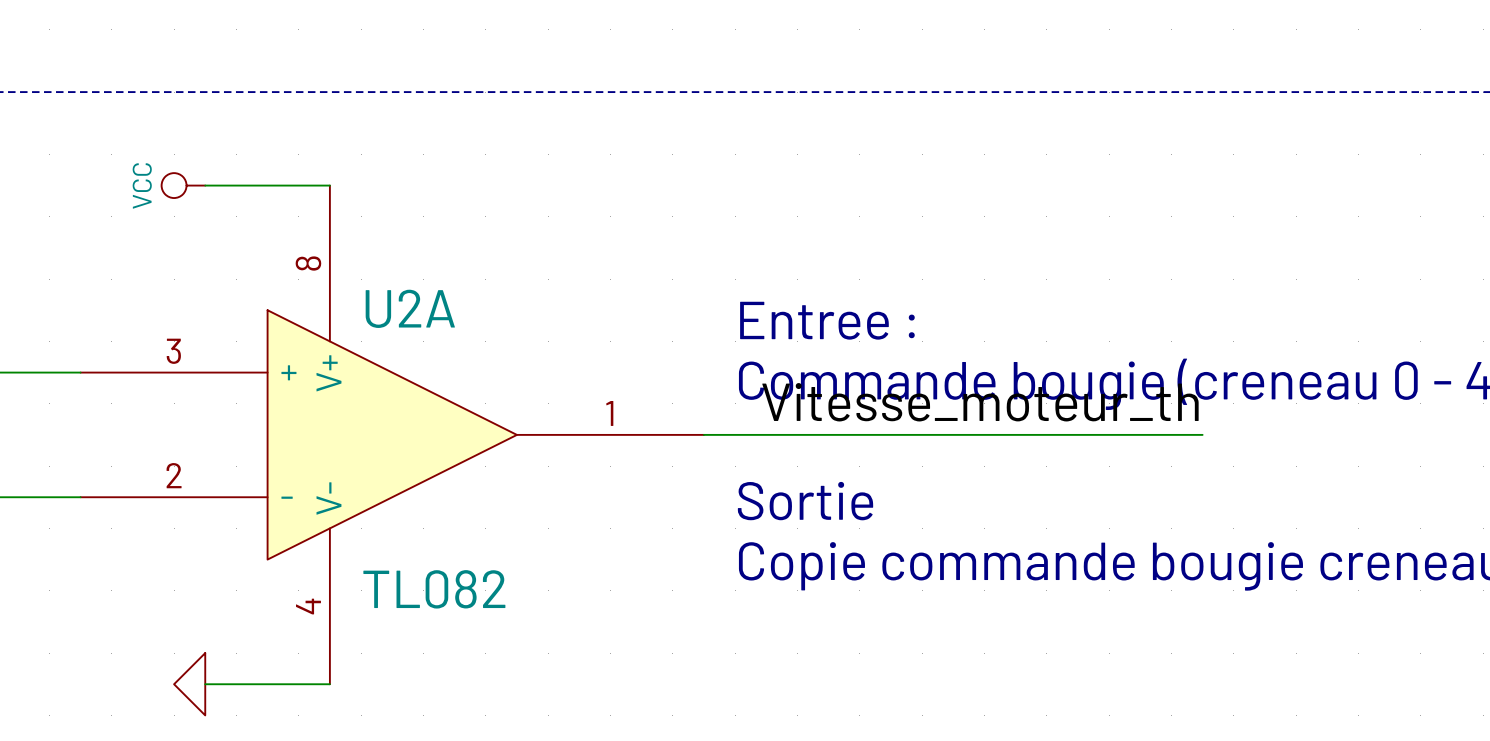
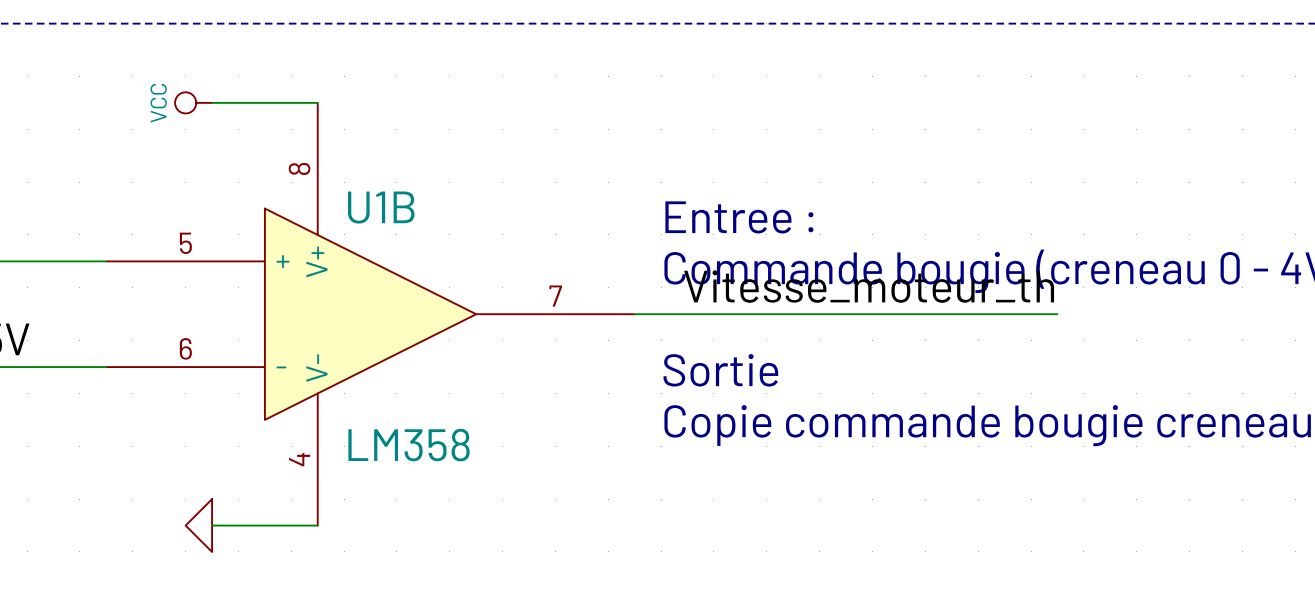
U2A name: U2A (410, 308) -> U1B (381, 207)
U2A pin number: 3 (173, 351) -> 5 (185, 243)
U2A pin number: 1 (609, 413) -> 7 (555, 296)
U2A pin number: 2 (174, 475) -> 6 (185, 348)
U2A value: TL082 (434, 589) -> LM358 (409, 445)

